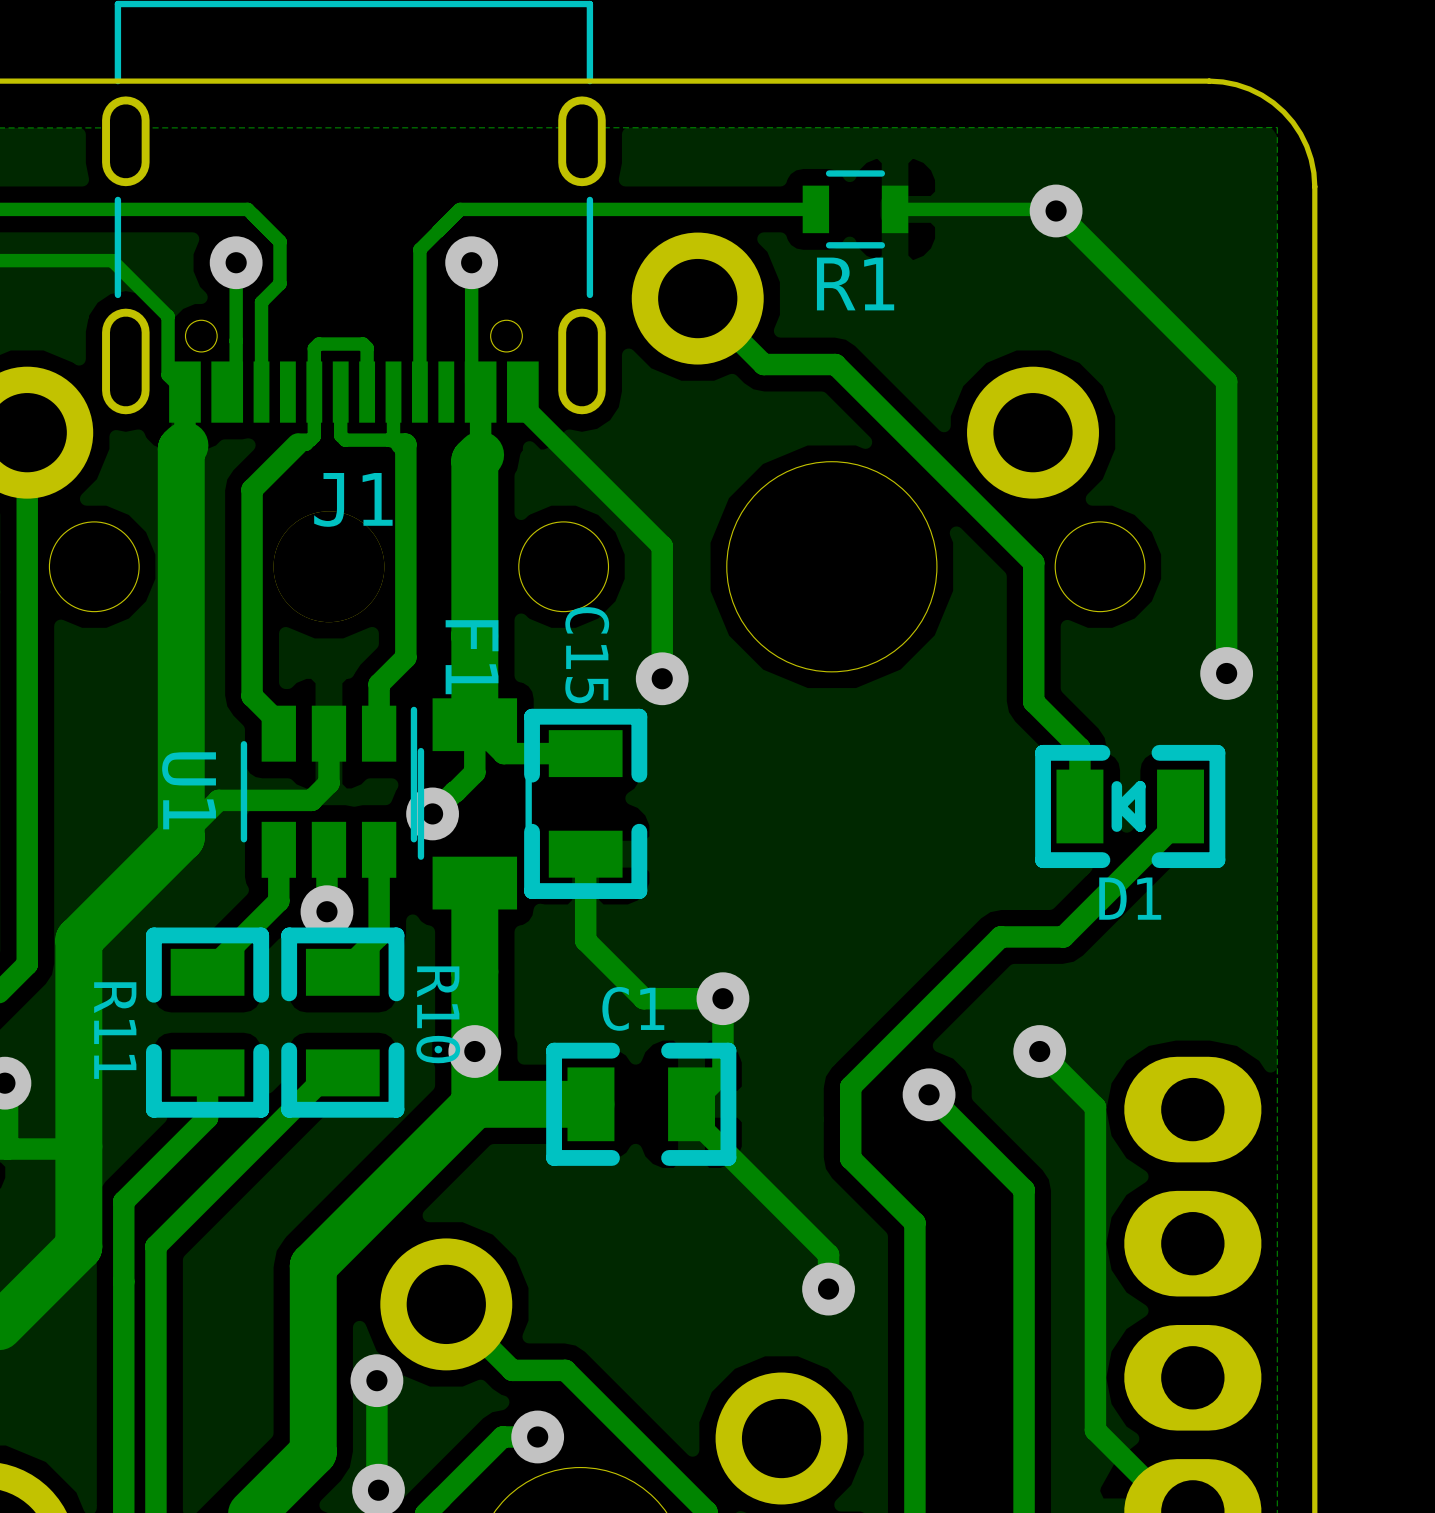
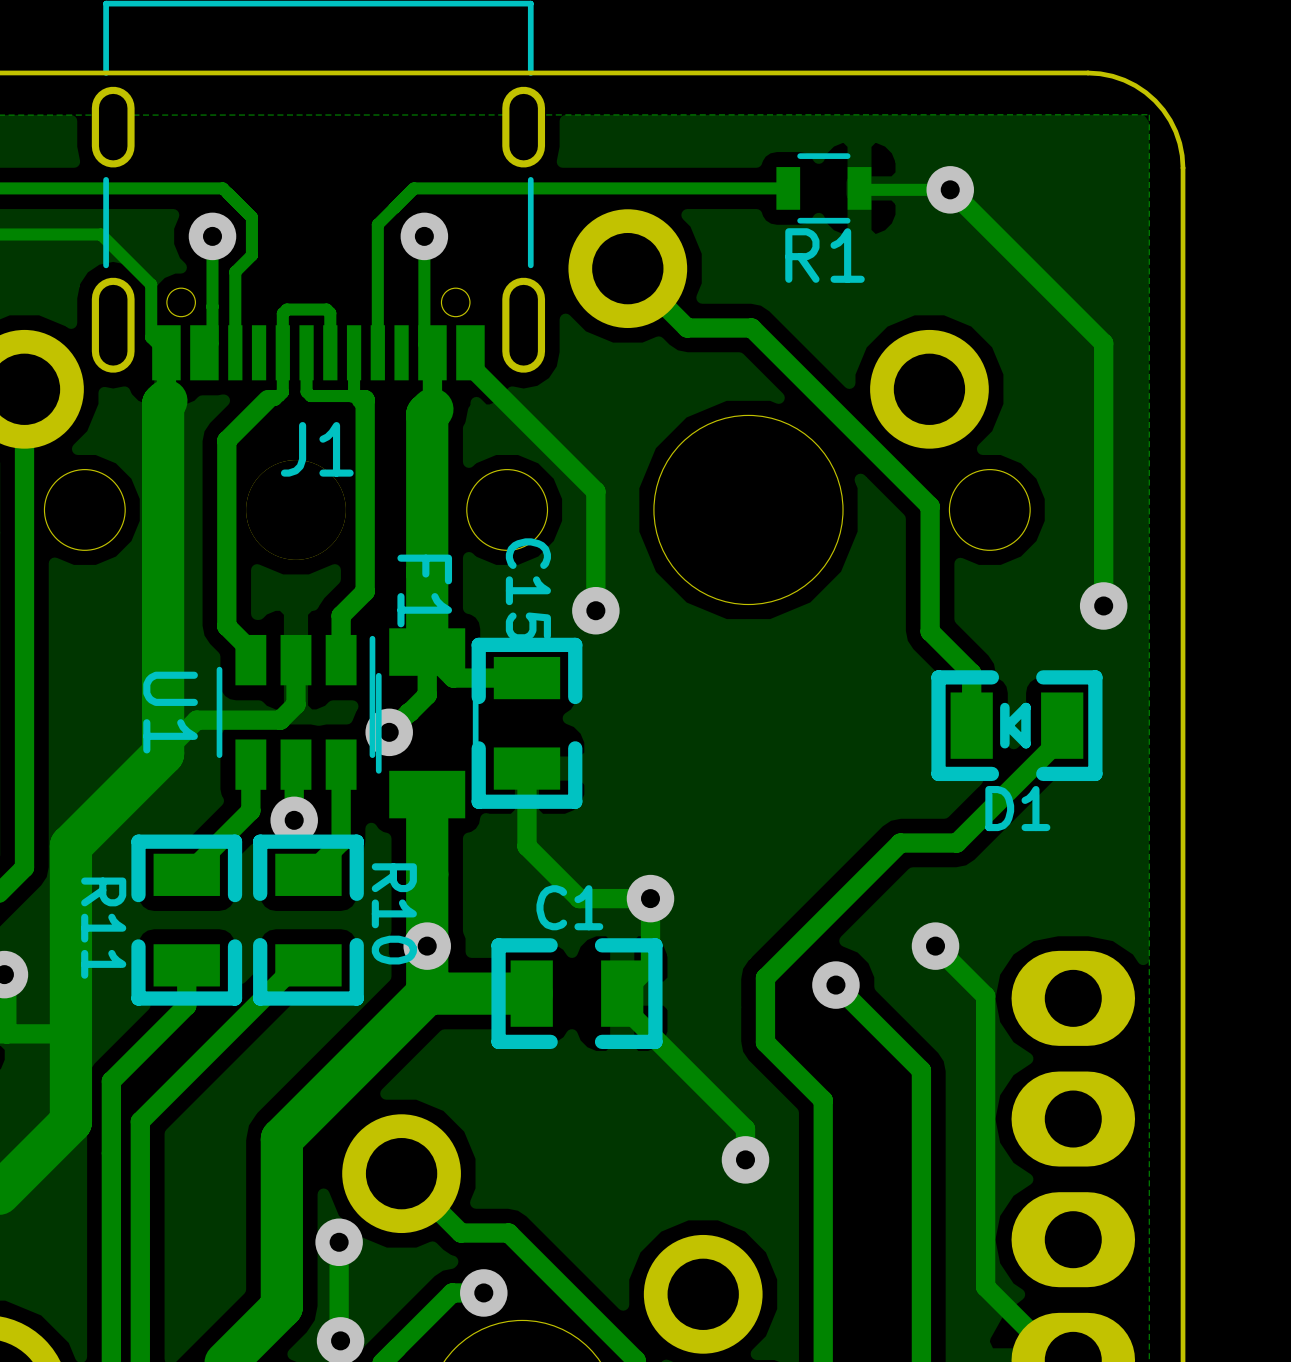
R1 position: (855, 209) -> (823, 188)
track: none -> (788, 188) (734, 188)
track: (895, 209) (1054, 209) (1056, 210) -> (859, 188) (950, 189)

